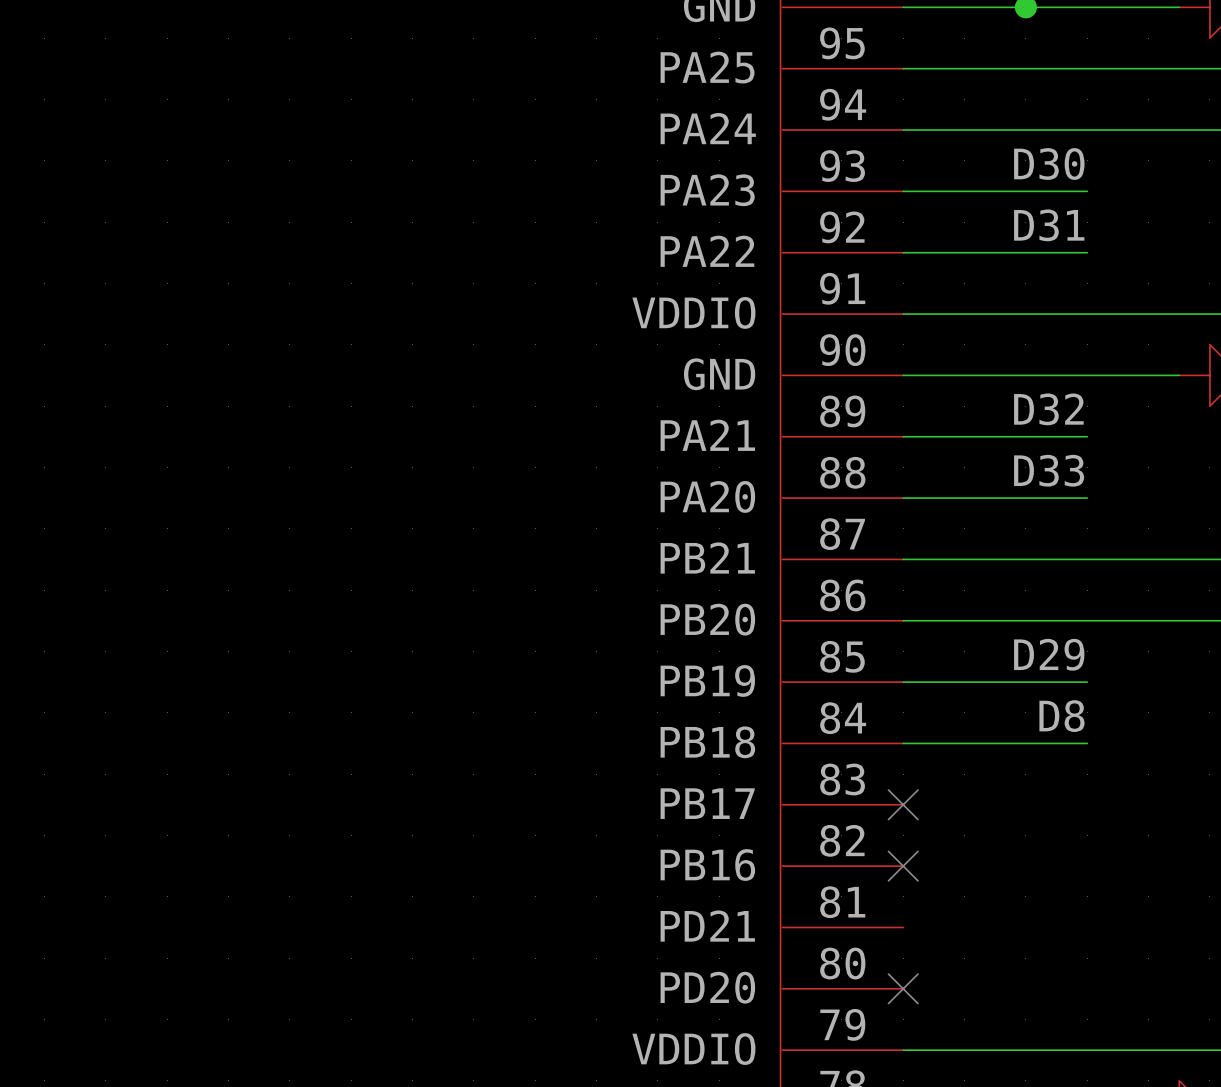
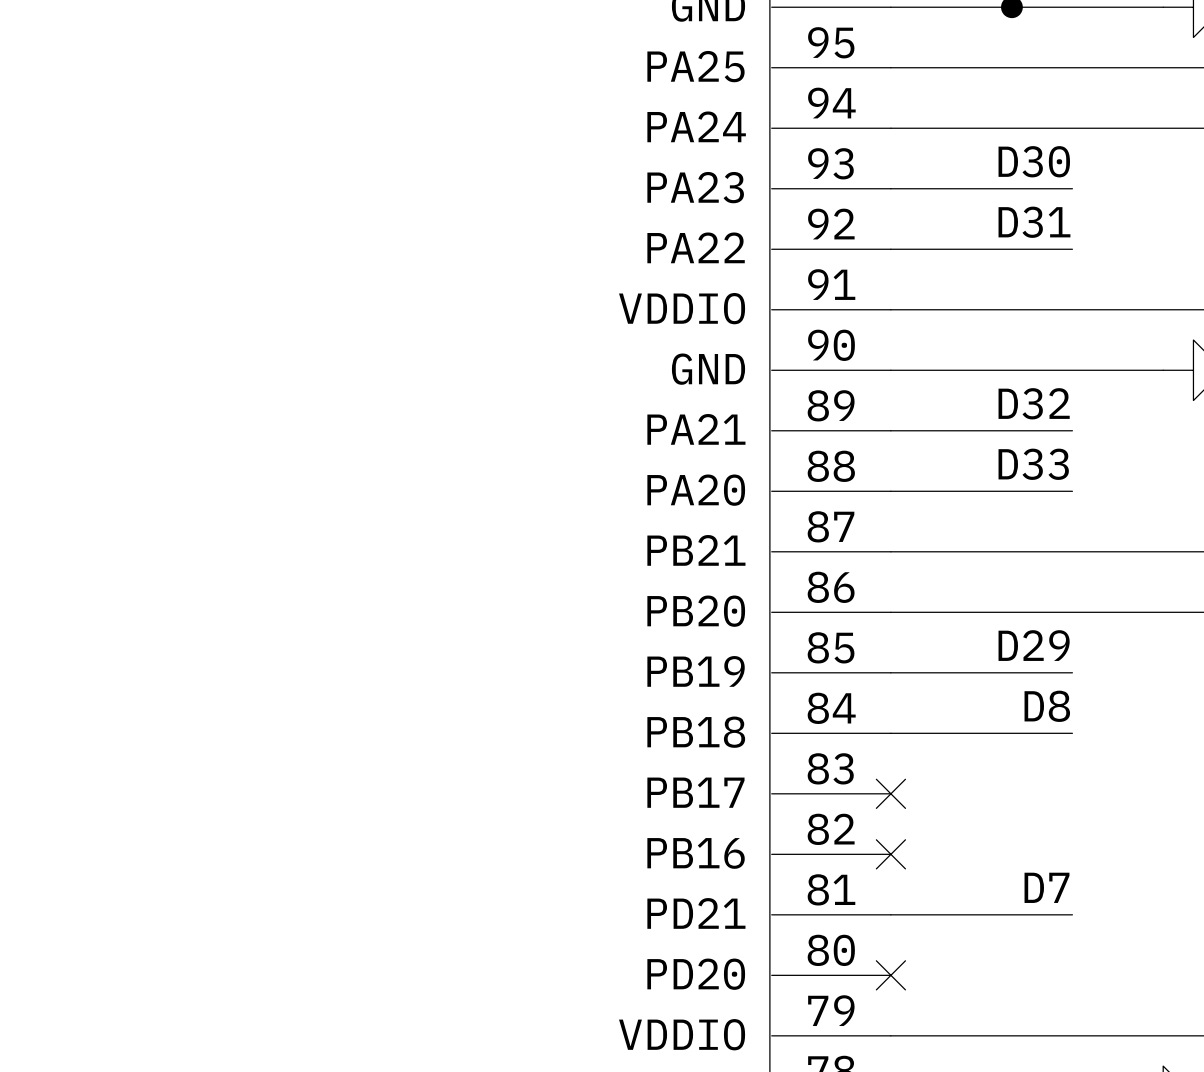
label: none -> D7 (1046, 887)
wire: none -> (890, 914) (1072, 914)

